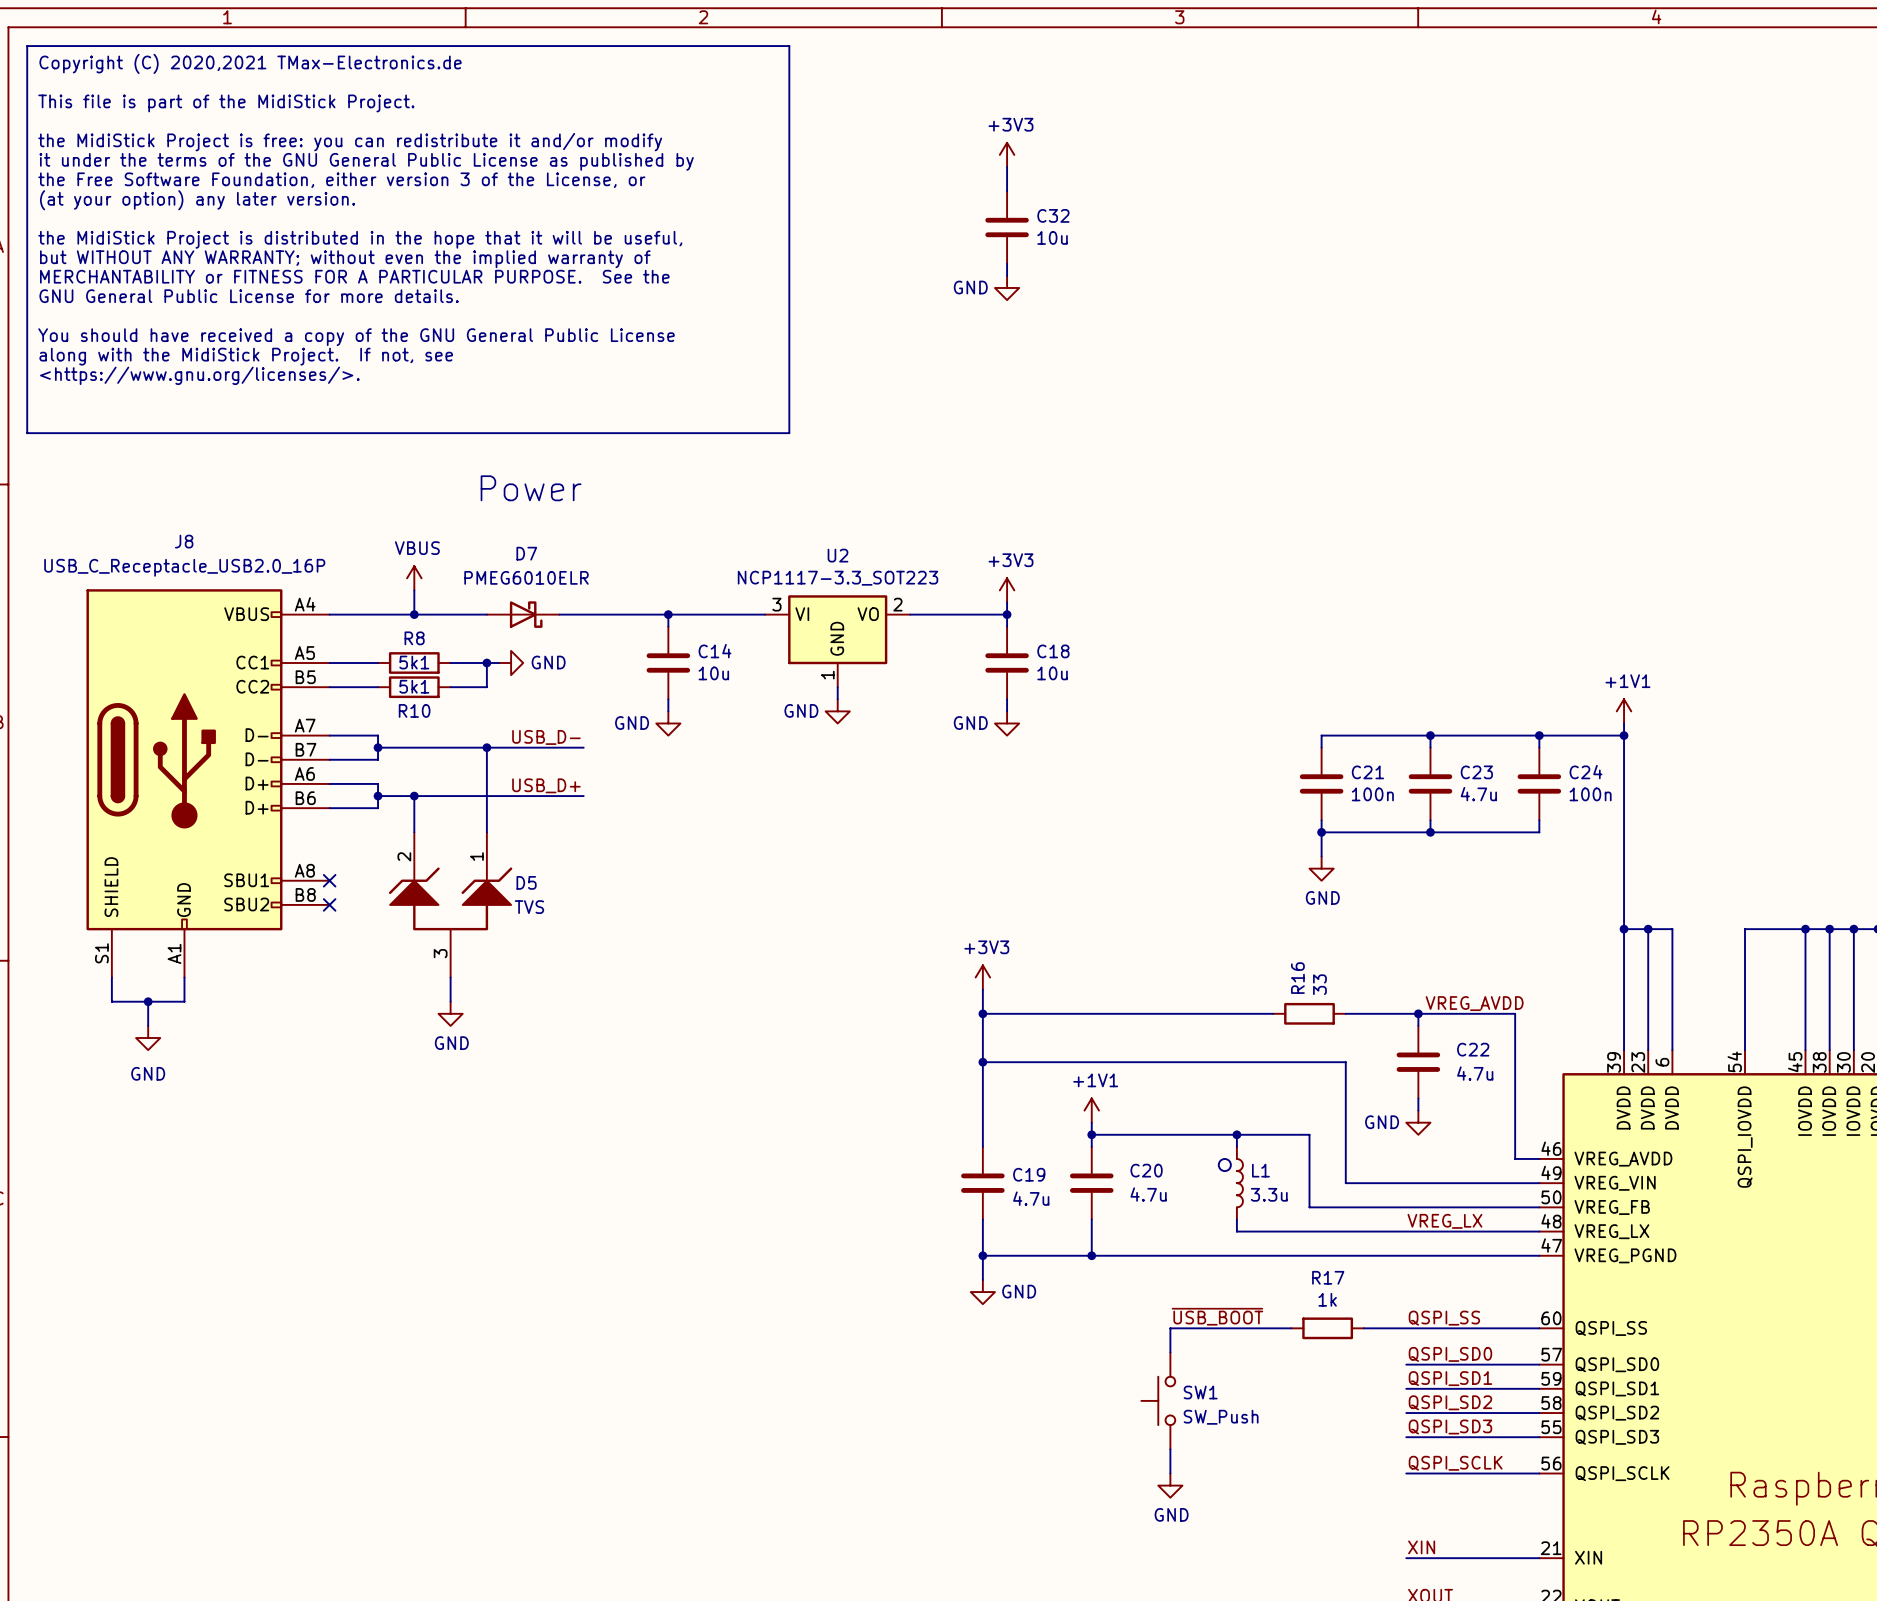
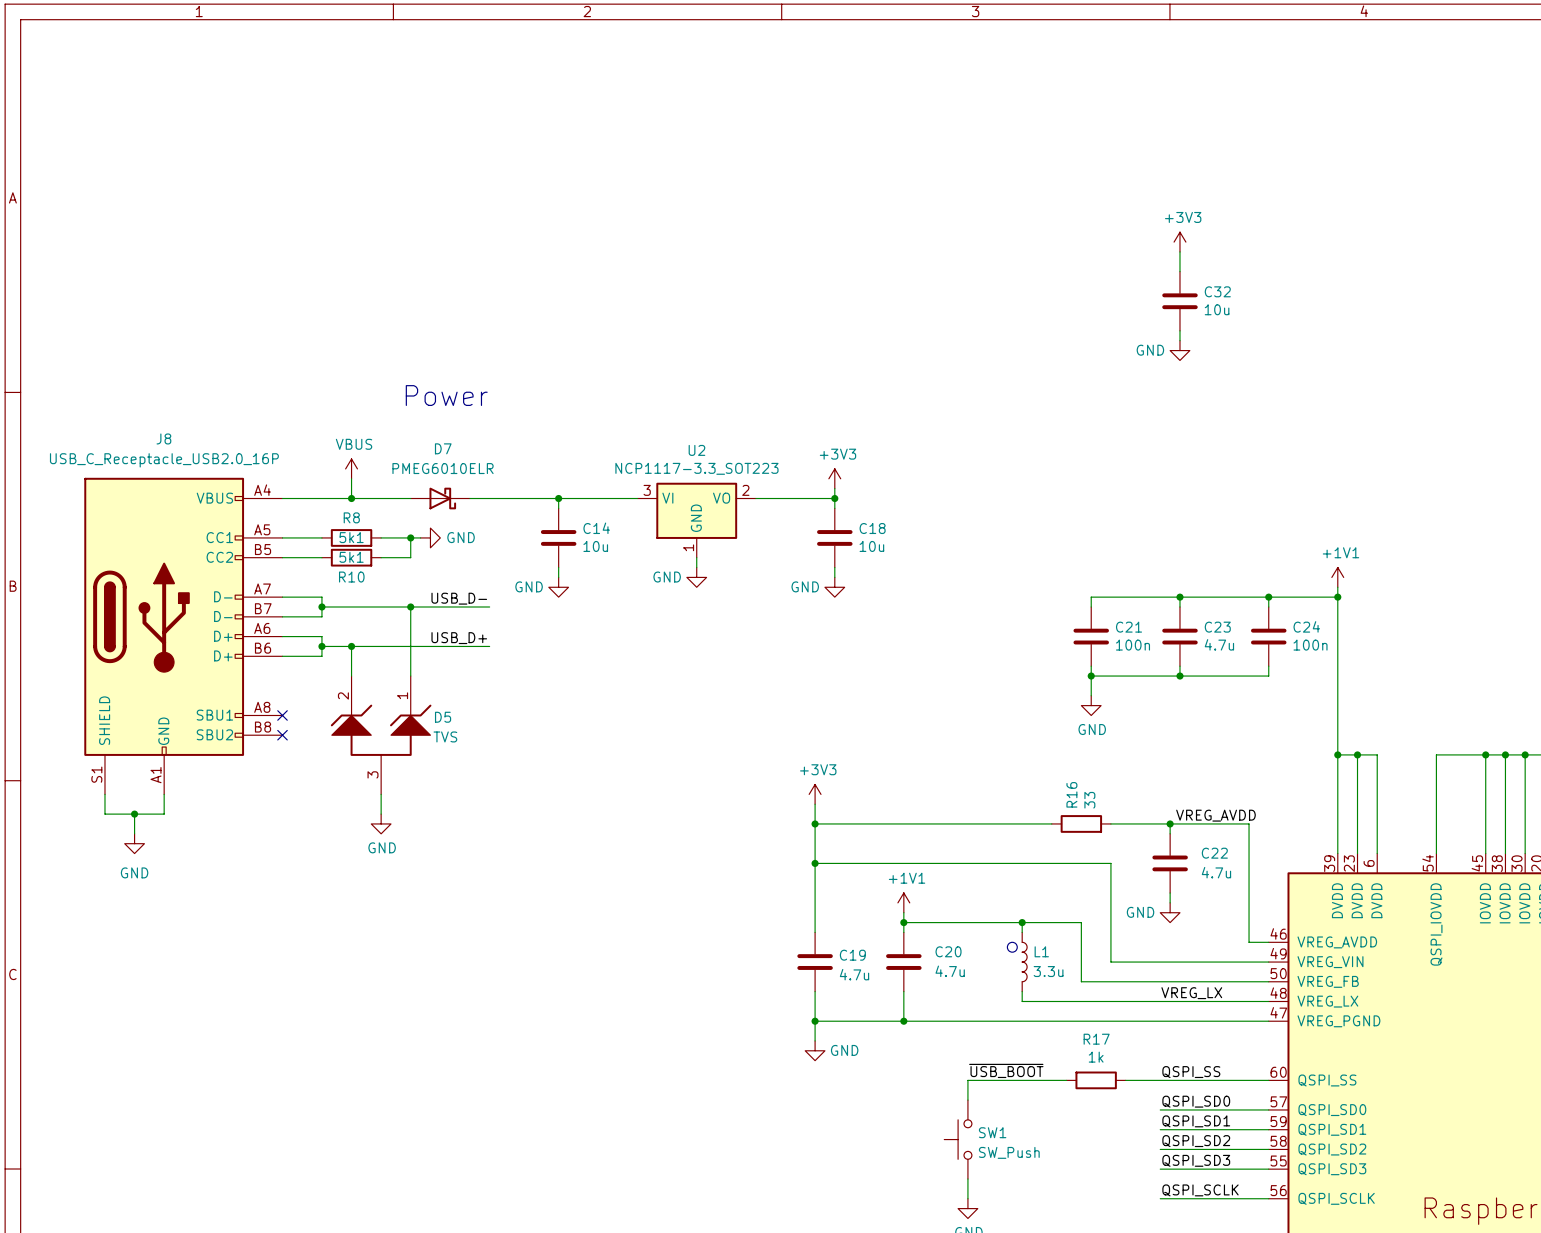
line: (27, 46) (789, 46) (789, 433) (27, 433) (27, 46) -> none
text: Copyright (C) 2020,2021 TMax-Electronics.de (250, 63) -> none
text: This file is part of the MidiStick Project. (226, 103) -> none
text: the MidiStick Project is free: you can redistribute it and/or modify (350, 142) -> none
power symbol: +3V3 (1007, 154) -> none
text: it under the terms of the GNU General Public License as published by (366, 161) -> none
wire: (1007, 167) (1007, 191) -> none
text: the Free Software Foundation, either version 3 of the License, or (341, 180) -> none
text: (at your option) any later version. (197, 200) -> none
C32 position: (1007, 227) -> (1179, 301)
text: the MidiStick Project is distributed in the hope that it will be useful, (360, 239) -> none
text: but WITHOUT ANY WARRANTY; without even the implied warranty of (345, 259) -> none
wire: (1007, 263) (1007, 275) -> none
text: MERCHANTABILITY or FITNESS FOR A PARTICULAR PURPOSE. See the (354, 276) -> none
power symbol: GND (1007, 287) -> none
text: GNU General Public License for more details. (249, 296) -> none
power symbol: none -> +3V3 (1179, 242)
wire: none -> (1179, 251) (1179, 271)
text: You should have received a copy of the GNU General Public License (356, 337) -> none
text: along with the MidiStick Project. If not, see (246, 356) -> none
text: <https://www.gnu.org/licenses/>. (199, 375) -> none
wire: none -> (1179, 330) (1179, 340)
power symbol: none -> GND (1179, 350)

